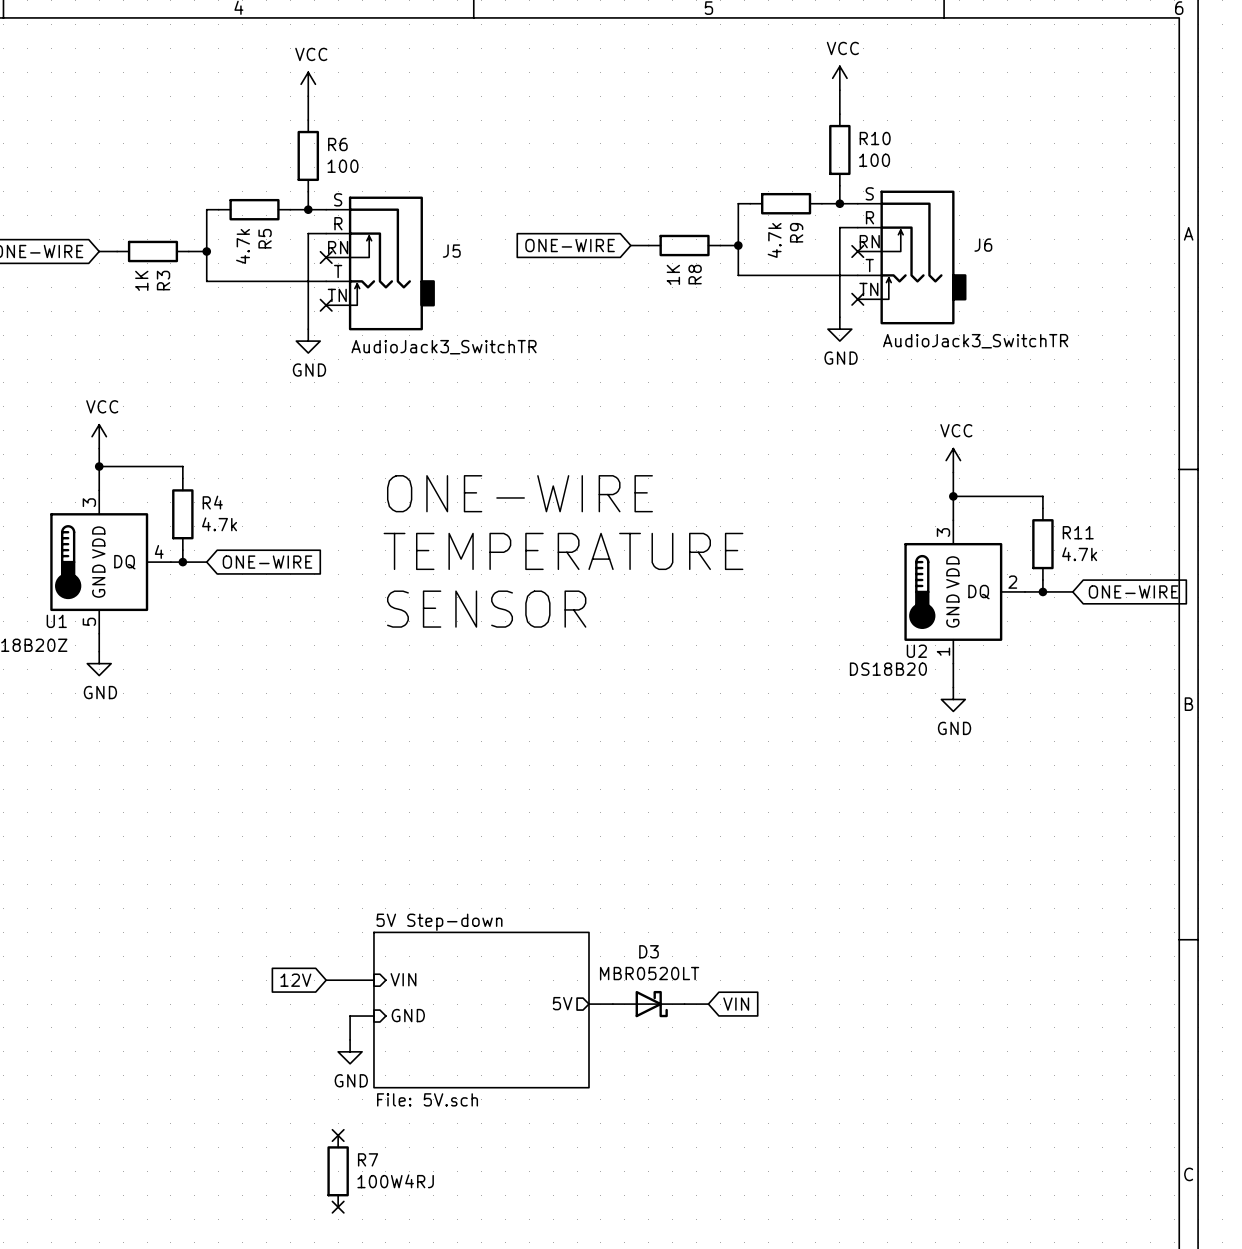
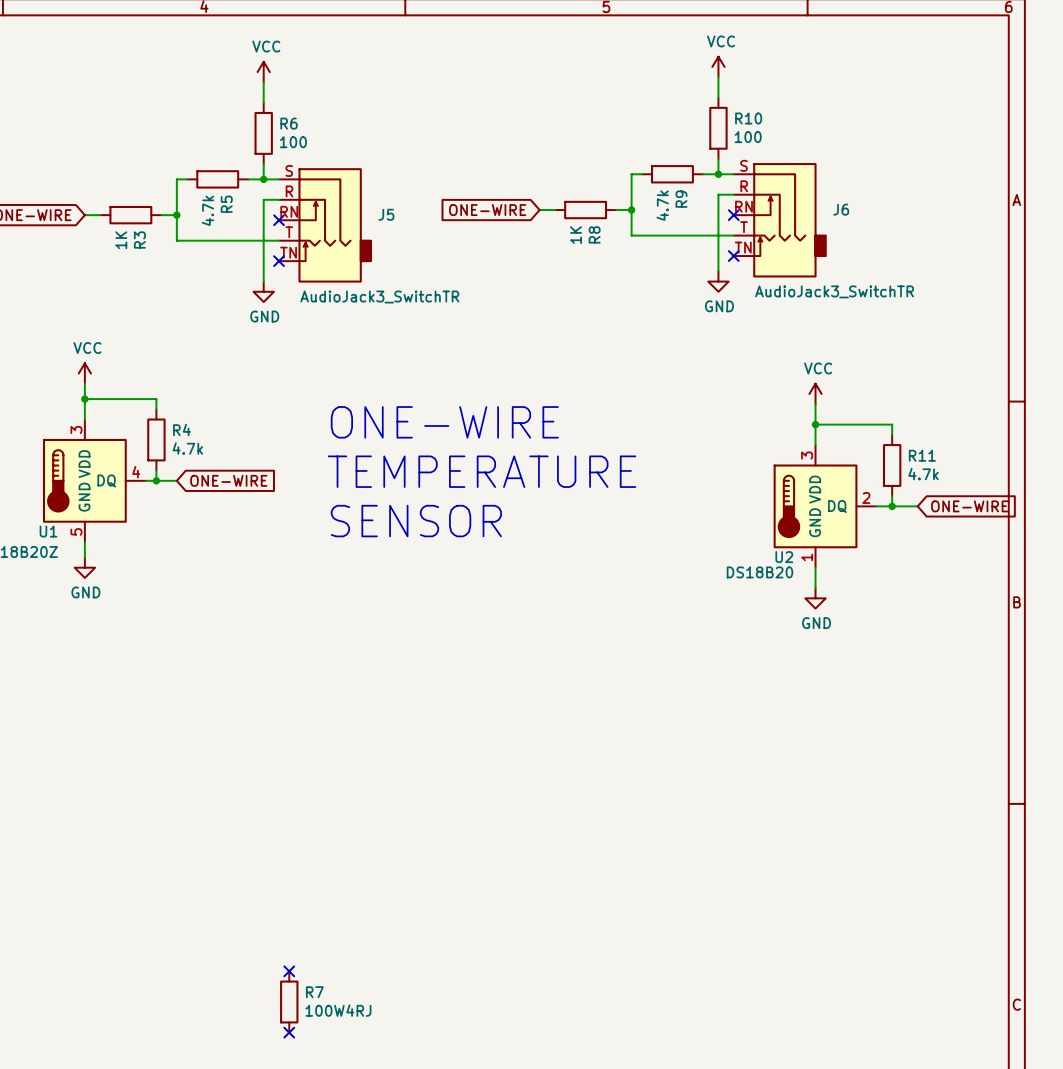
sheet pin: VIN (403, 979) -> none
global label: 12V (295, 980) -> none
wire: (326, 980) (373, 980) -> none
sheet pin: 5V (562, 1003) -> none
wire: (588, 1004) (612, 1004) -> none
D3: MBR0520LT (648, 1004) -> none
wire: (684, 1004) (708, 1004) -> none
global label: VIN (736, 1004) -> none
sheet 5V Step-down: File: 5V.sch (481, 1010) -> none
sheet pin: GND (408, 1015) -> none
wire: (373, 1016) (350, 1016) (350, 1039) -> none
power symbol: GND (350, 1051) -> none

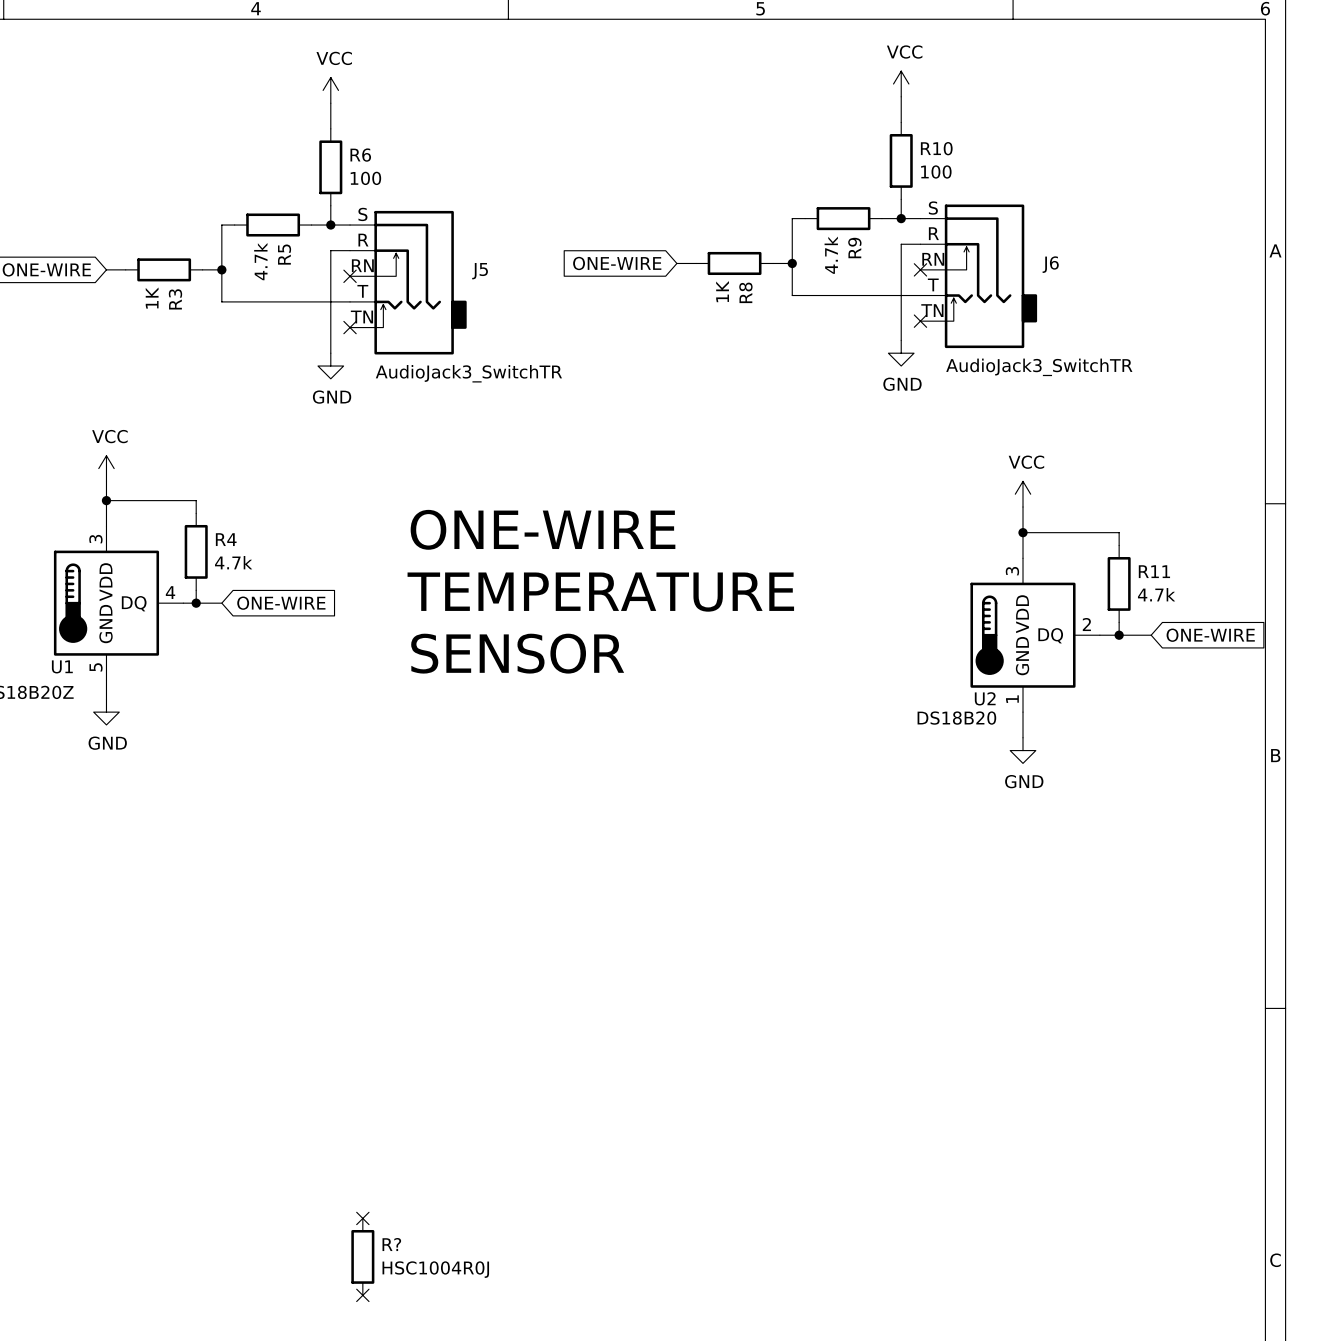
R7 name: R7 (314, 992) -> R? (391, 1244)
R7 value: 100W4RJ (338, 1010) -> HSC1004R0J (435, 1269)

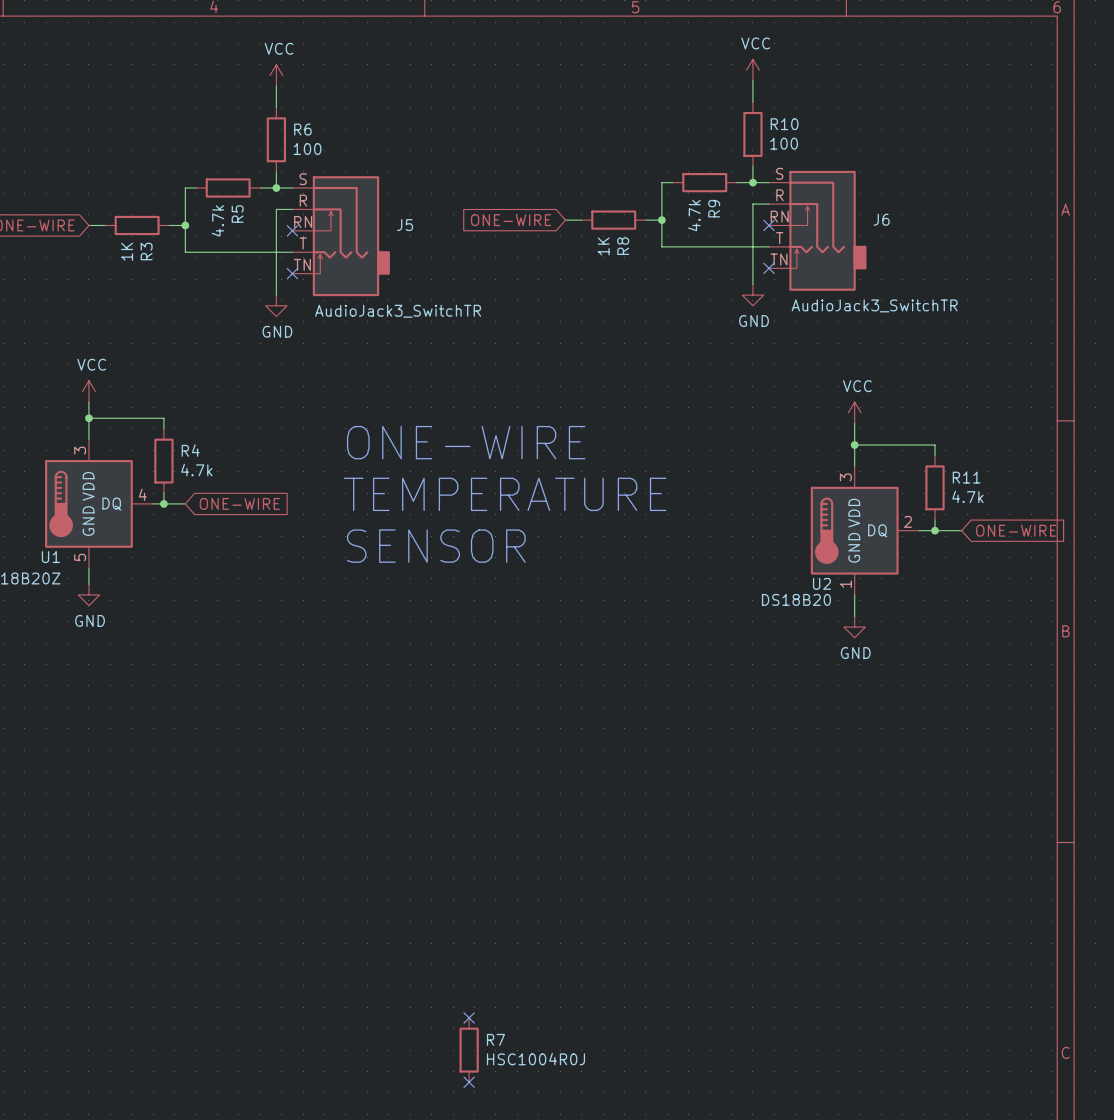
no-connect mark: (362, 1218) -> none
no-connect mark: none -> (469, 1017)
R?: HSC1004R0J (362, 1256) -> none
R7: none -> HSC1004R0J (469, 1050)
no-connect mark: (362, 1295) -> none
no-connect mark: none -> (469, 1082)

